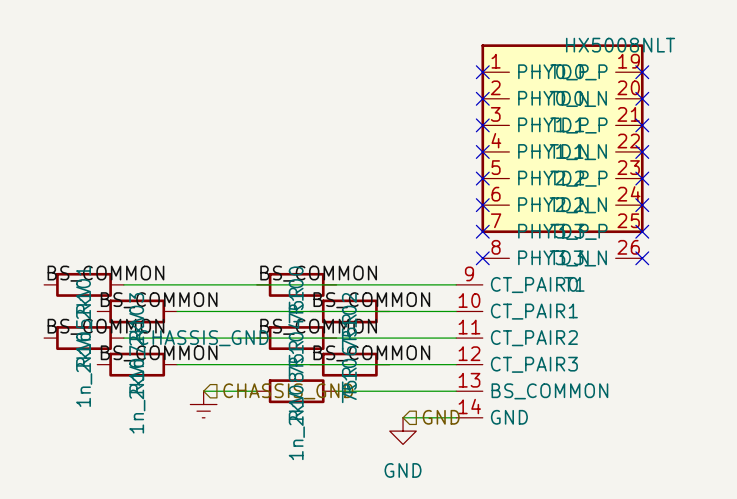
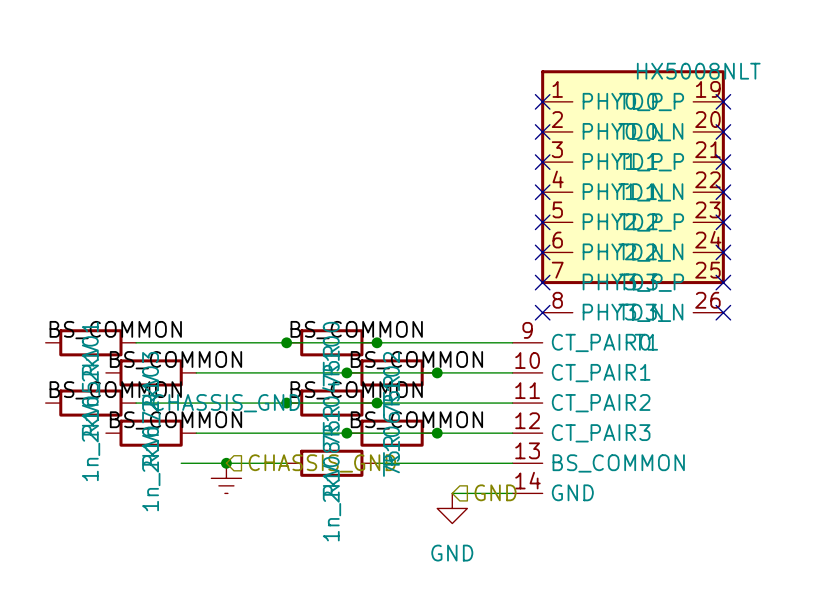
junction: none -> (286, 342)
junction: none -> (377, 342)
junction: none -> (346, 372)
junction: none -> (437, 372)
junction: none -> (286, 403)
junction: none -> (377, 403)
junction: none -> (346, 433)
junction: none -> (437, 433)
wire: none -> (181, 463) (226, 463)
junction: none -> (226, 463)

